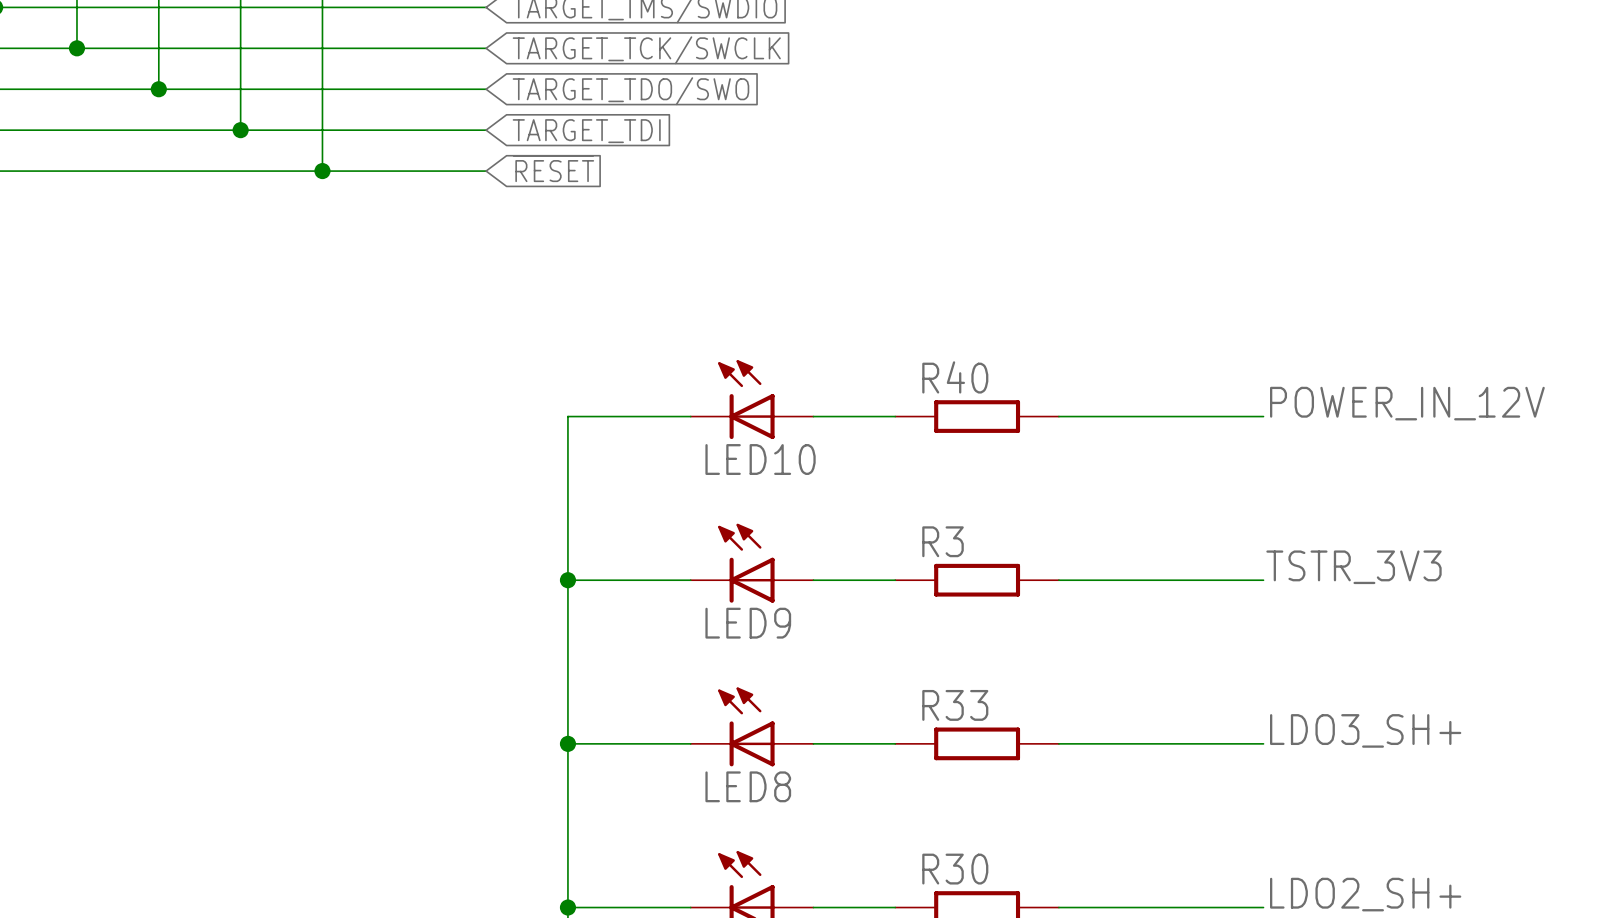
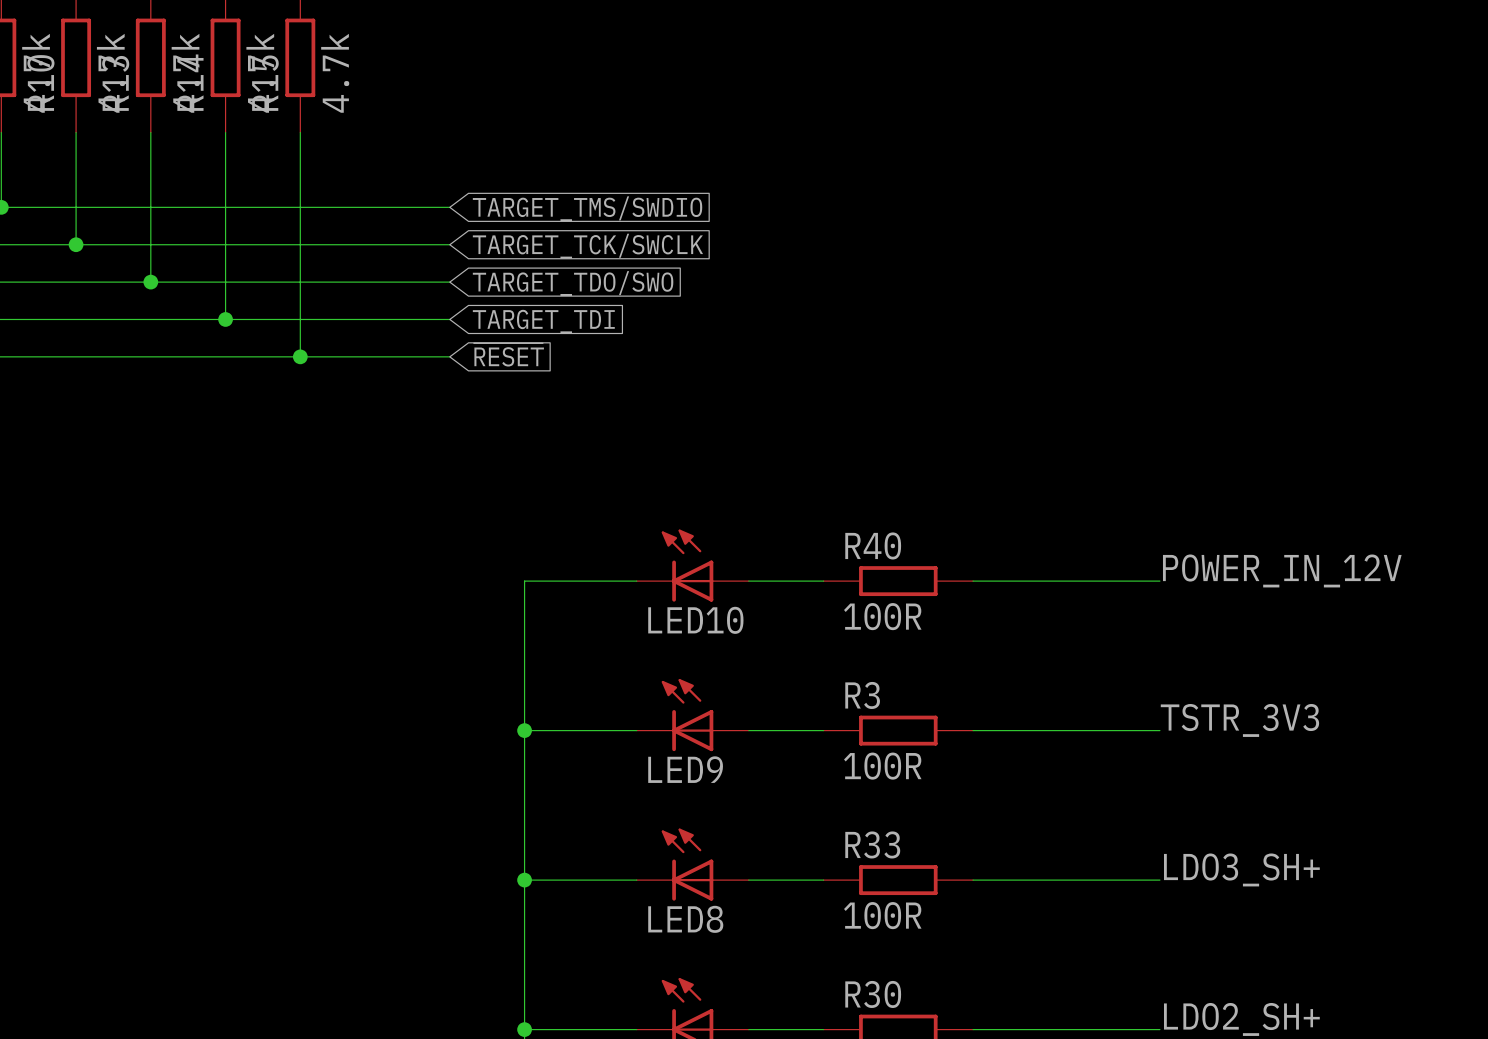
R40 value: none -> 100R (882, 616)
R3 value: none -> 100R (882, 766)
R33 value: none -> 100R (882, 915)

